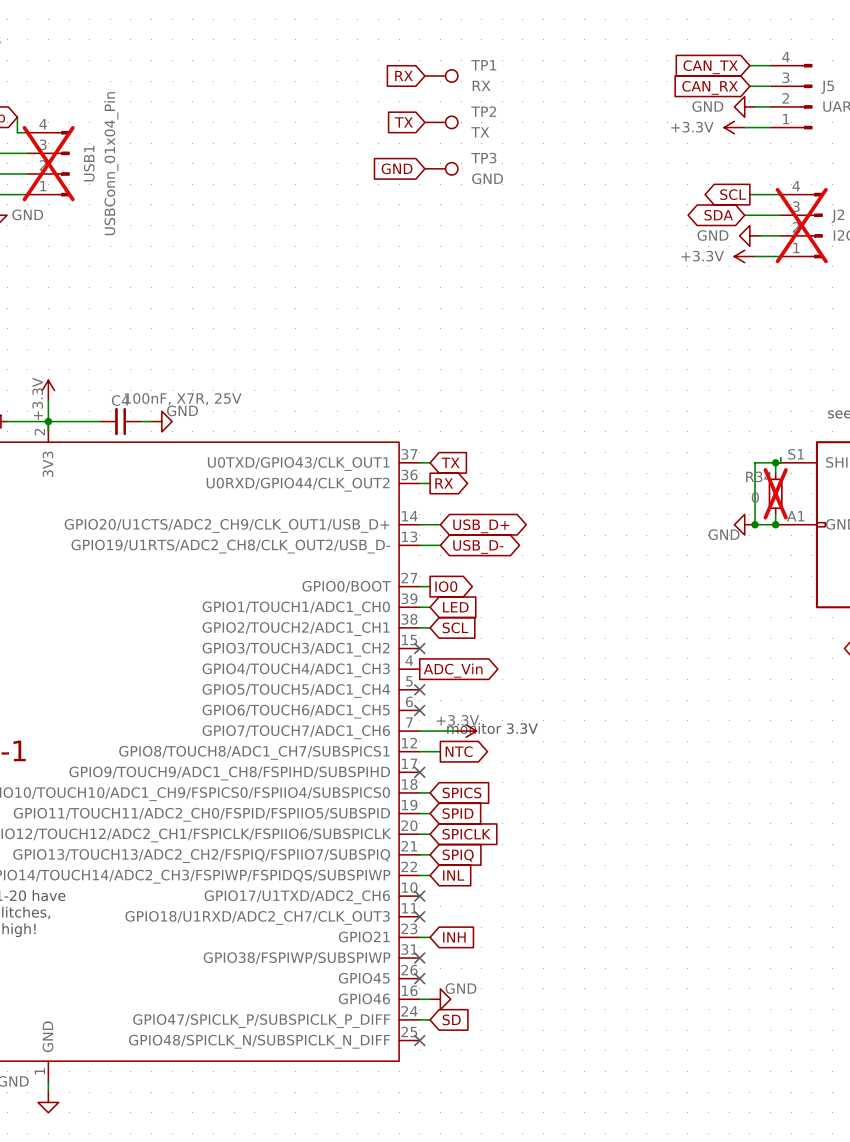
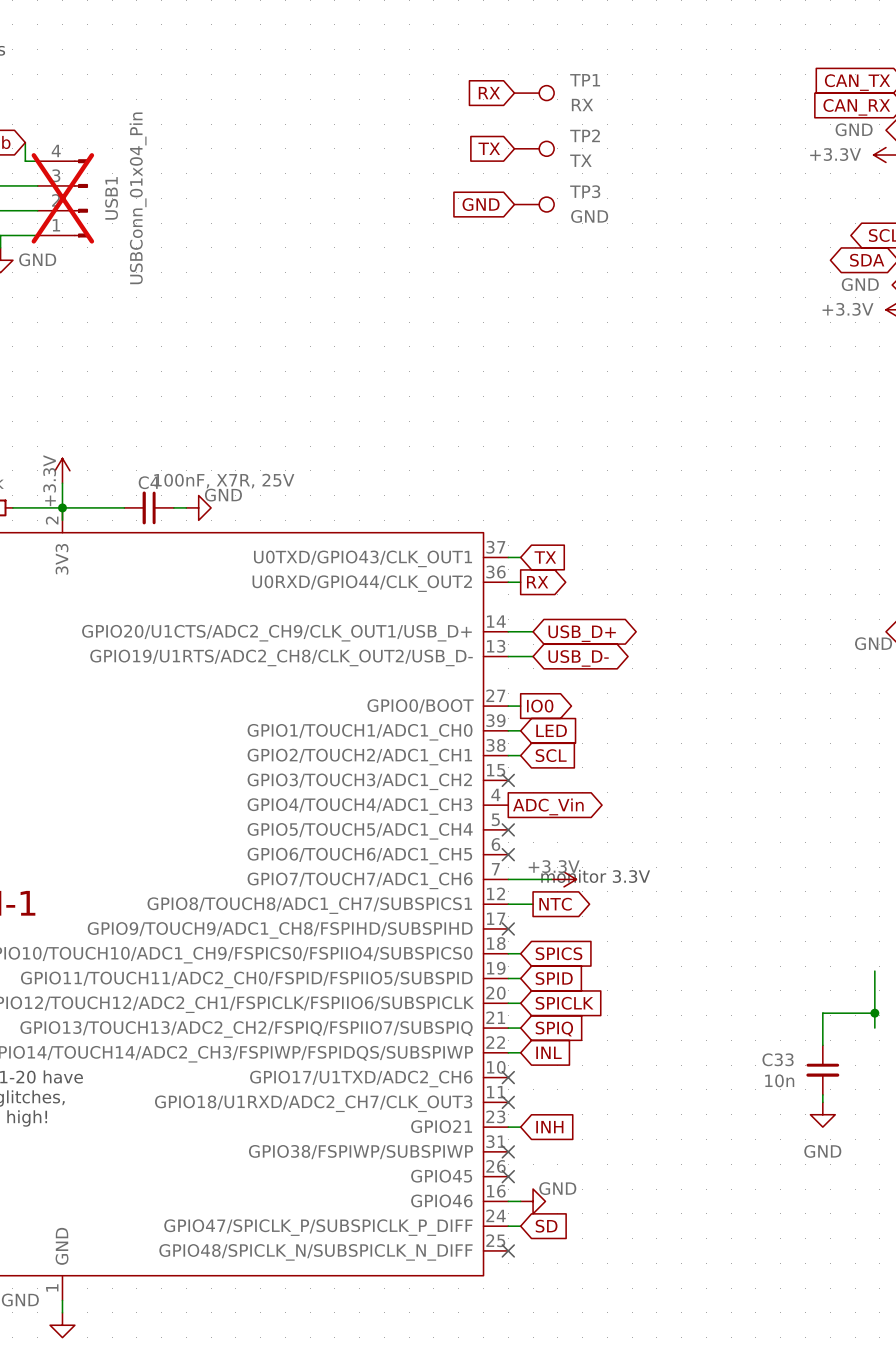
wire: none -> (874, 971) (874, 1028)
wire: none -> (874, 1013) (822, 1013) (822, 1045)
junction: none -> (874, 1013)
C33: none -> 10n (822, 1070)
wire: none -> (822, 1094) (822, 1102)
power symbol: none -> GND (822, 1114)

